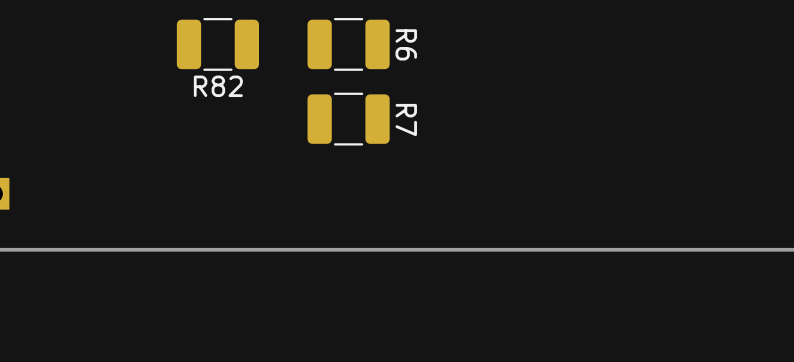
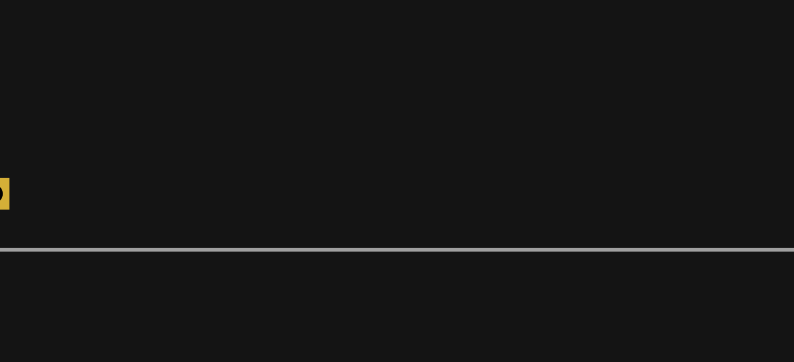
R82: (217, 44) -> none
R6: (348, 44) -> none
R7: (348, 119) -> none

